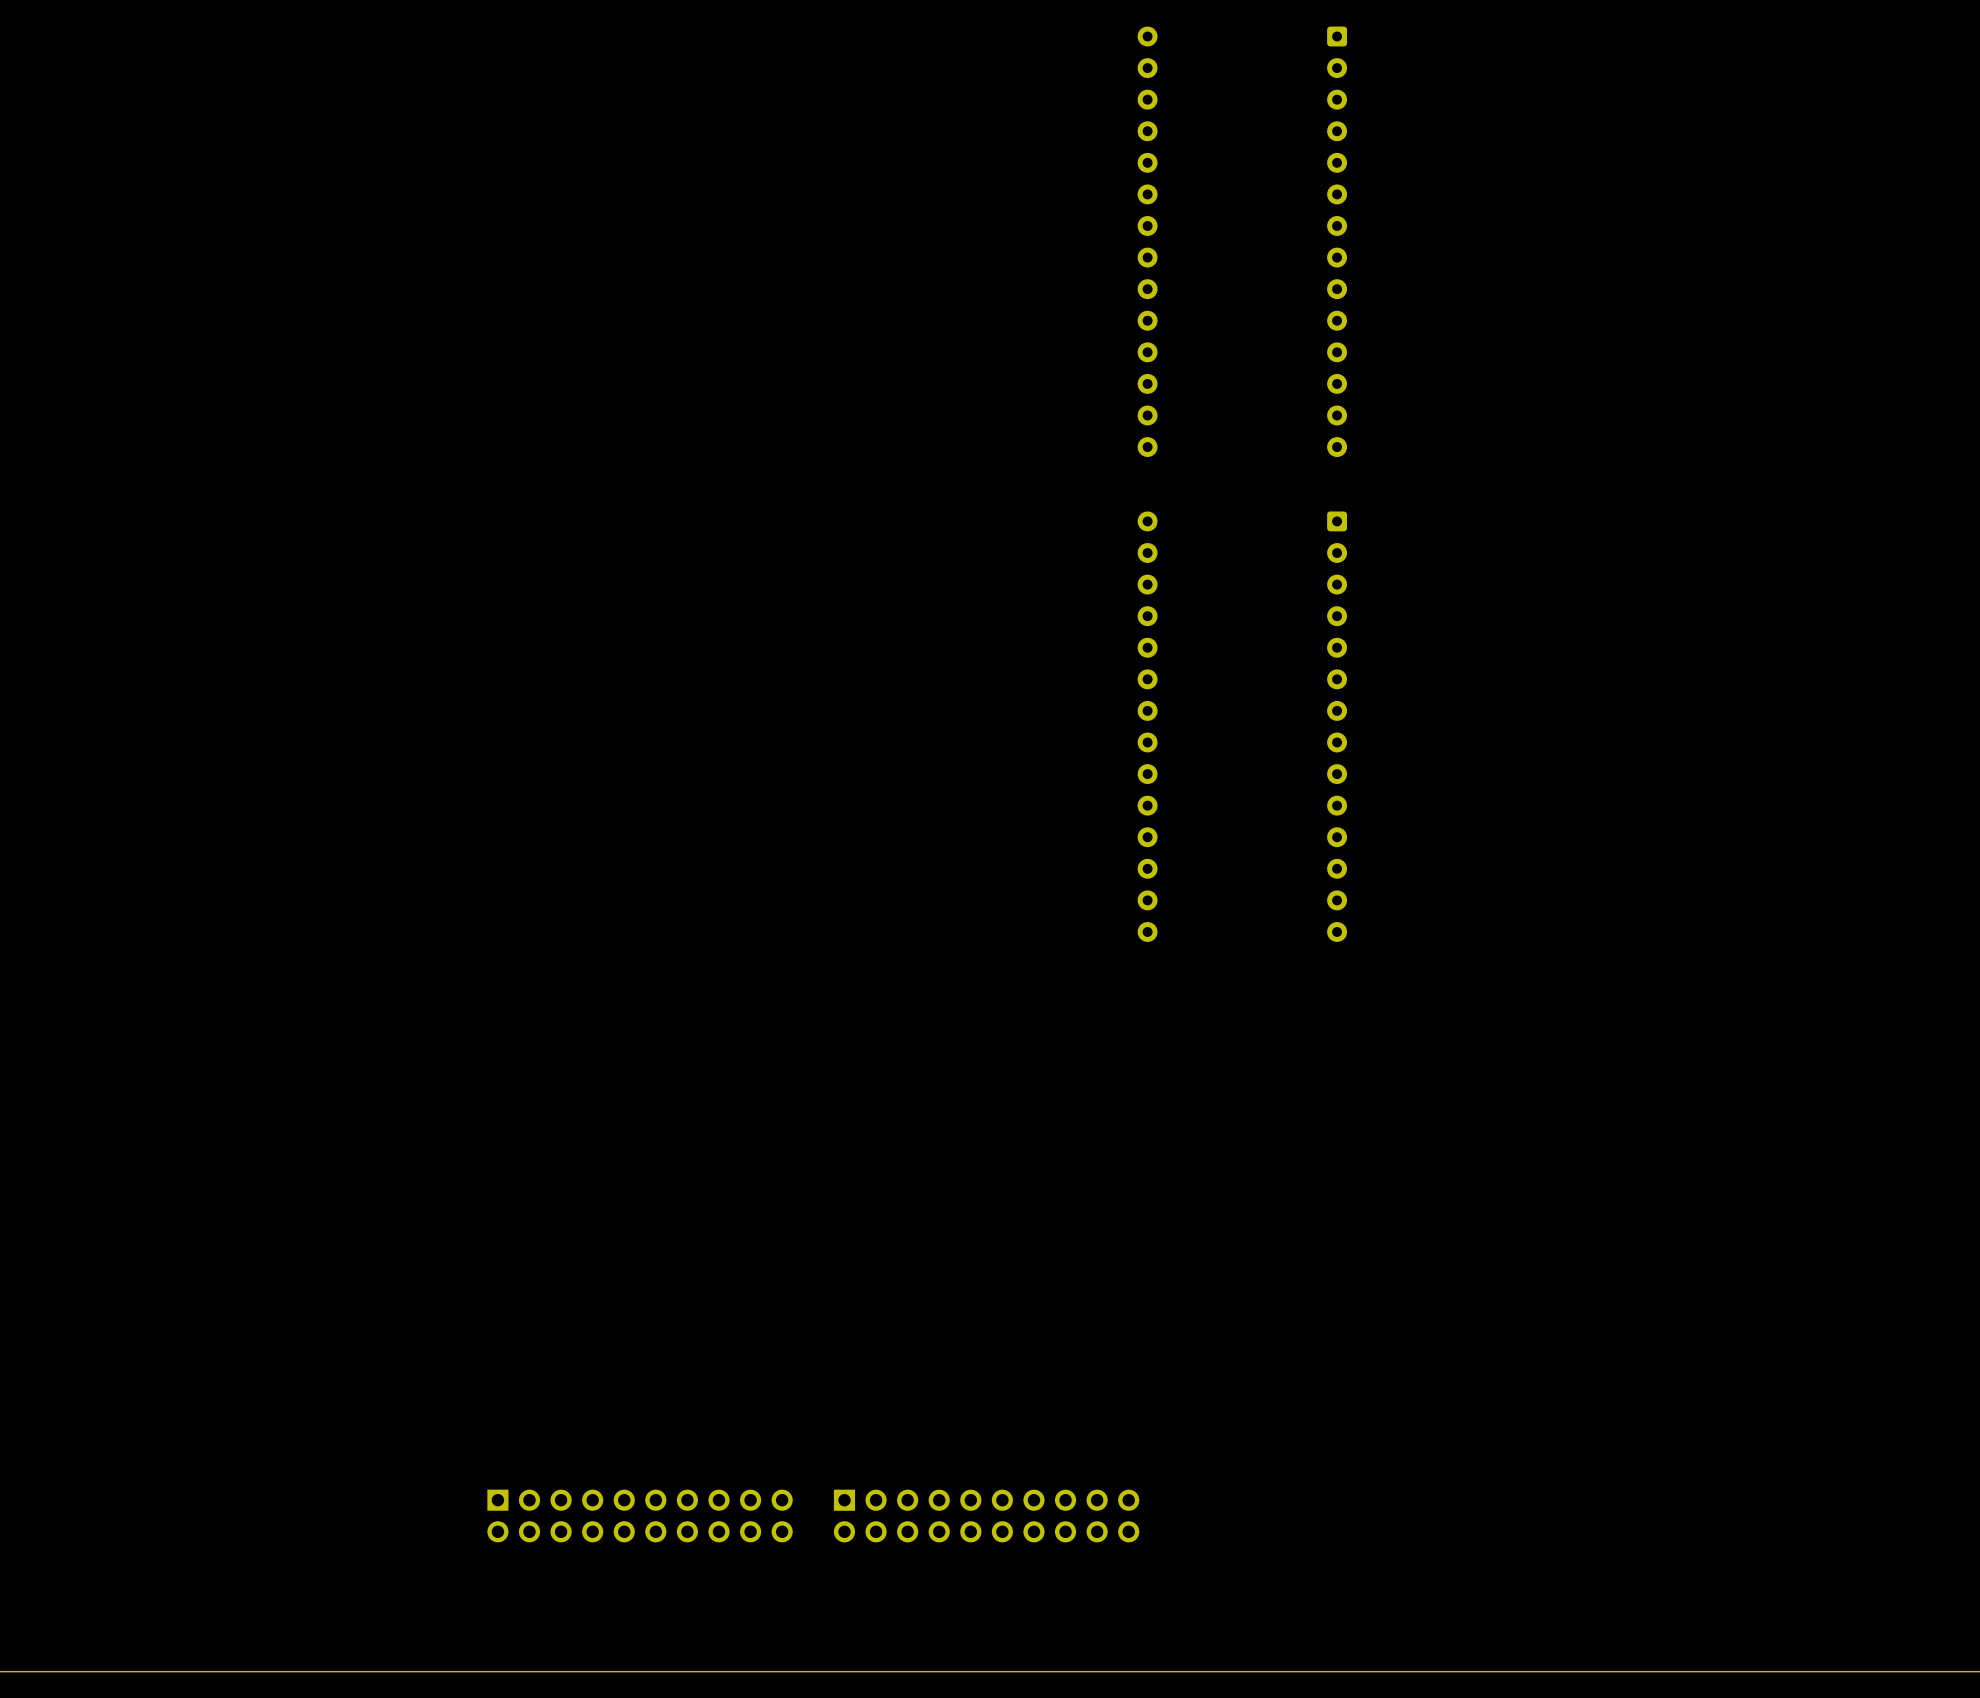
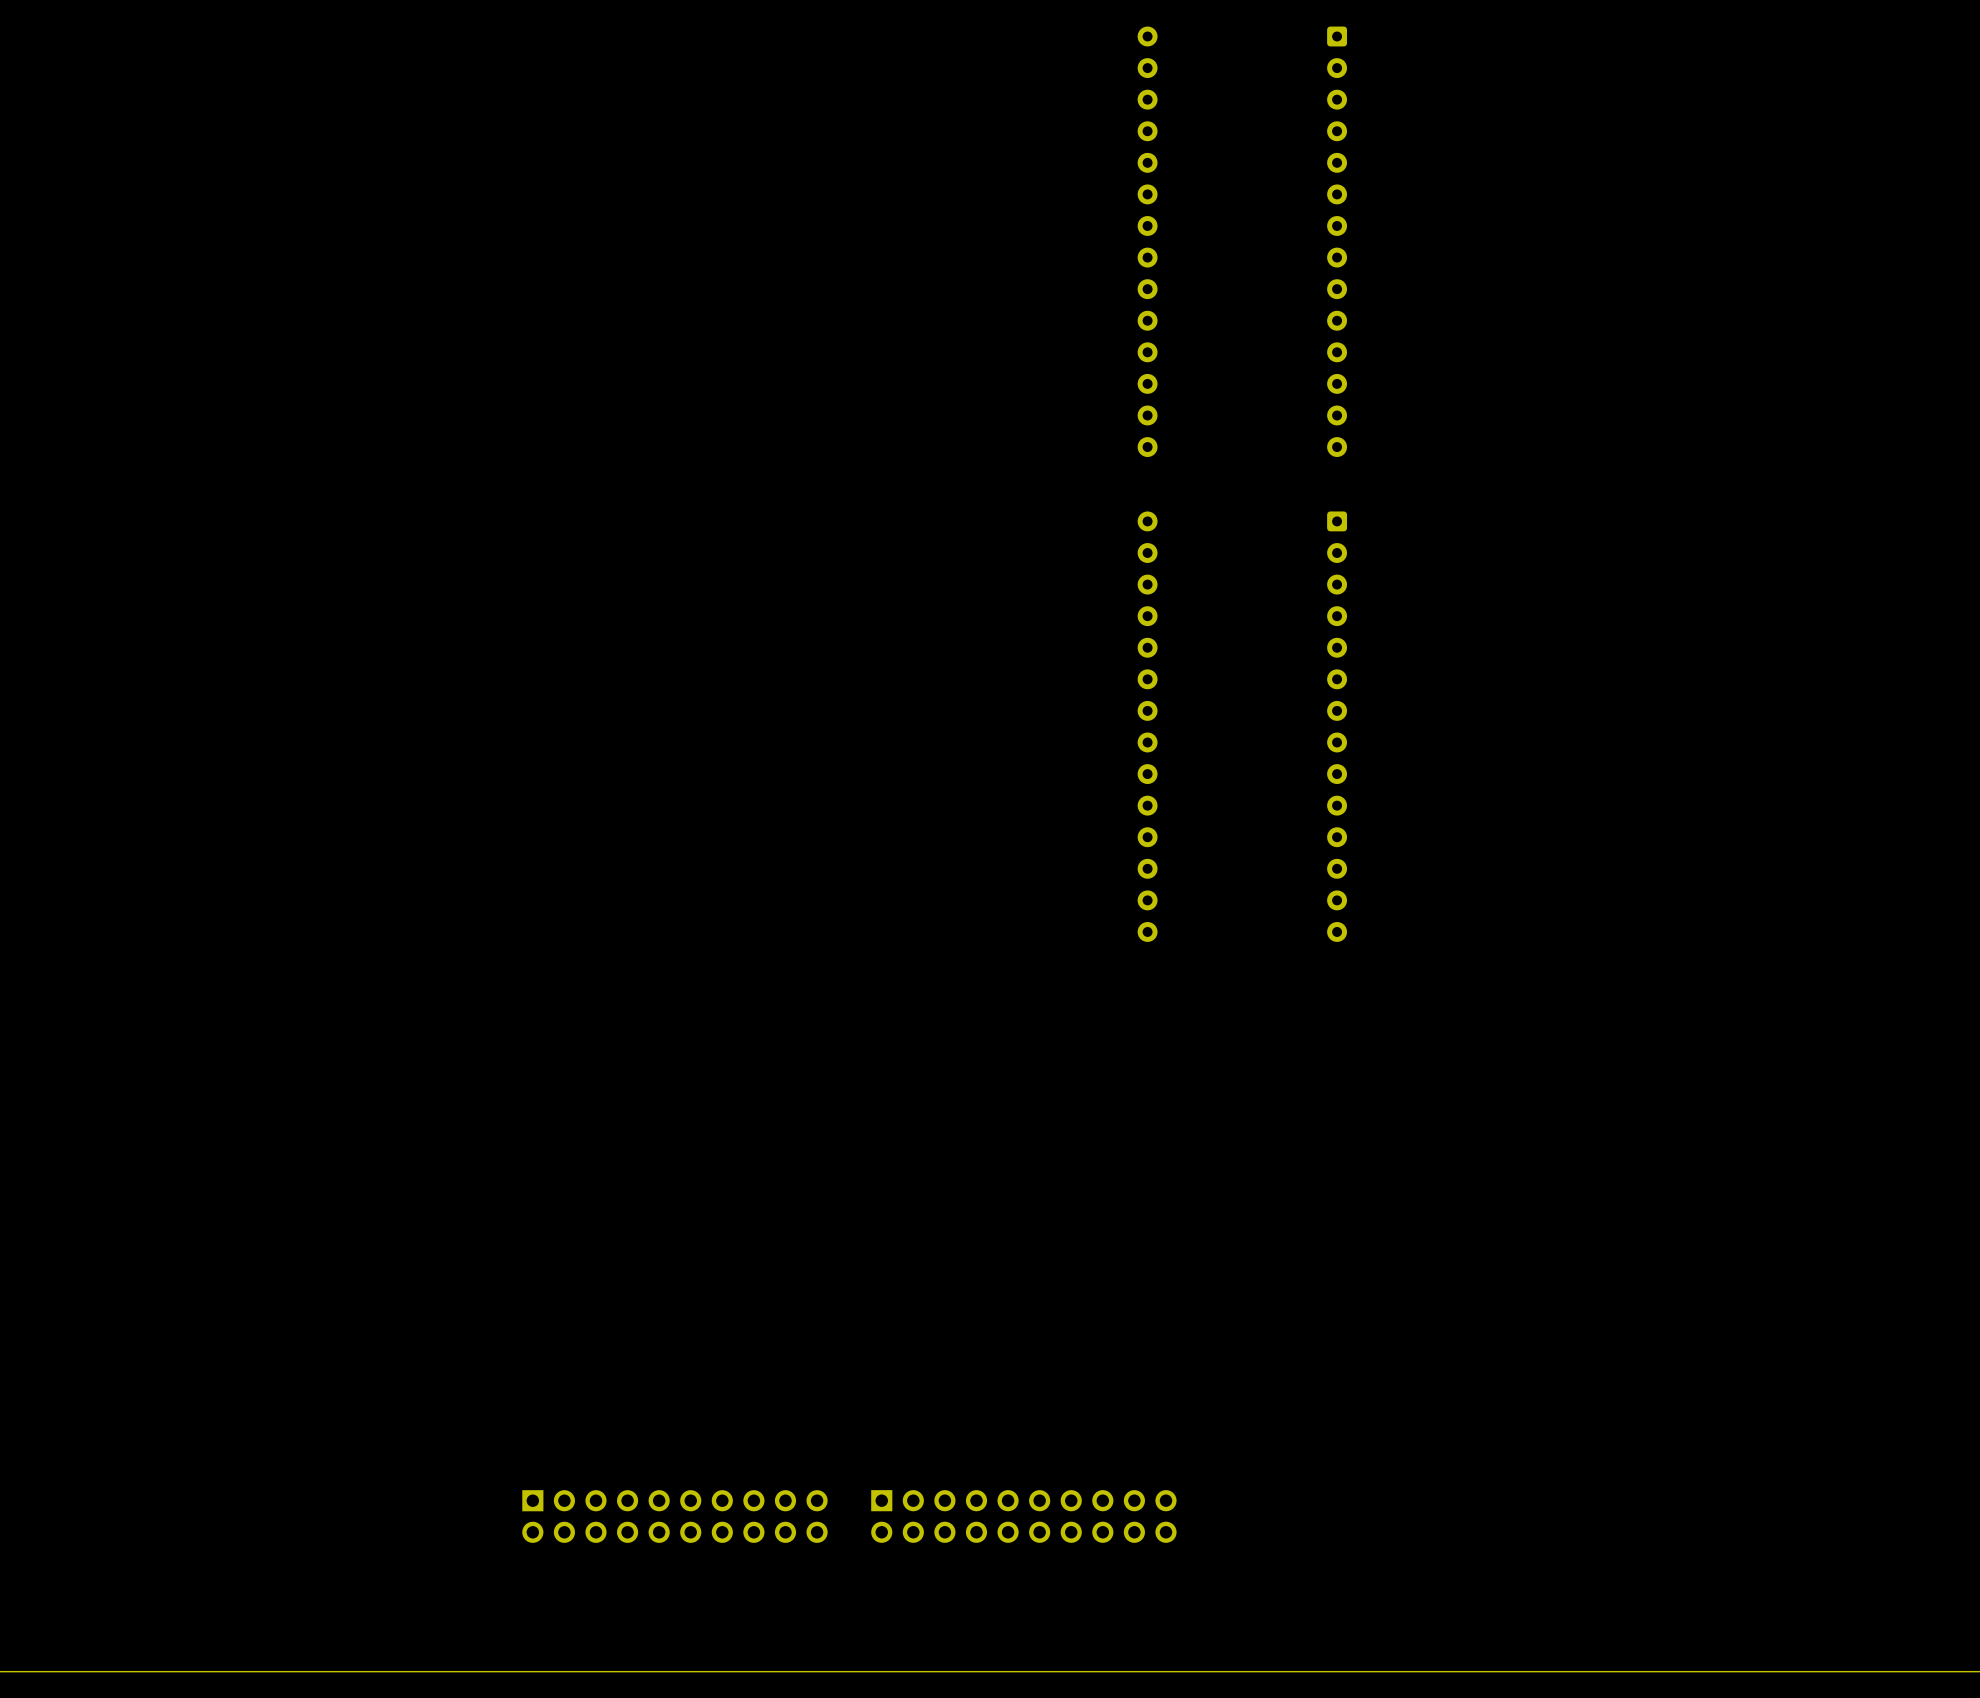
part position: (640, 1515) -> (674, 1516)
part position: (986, 1516) -> (1023, 1516)

